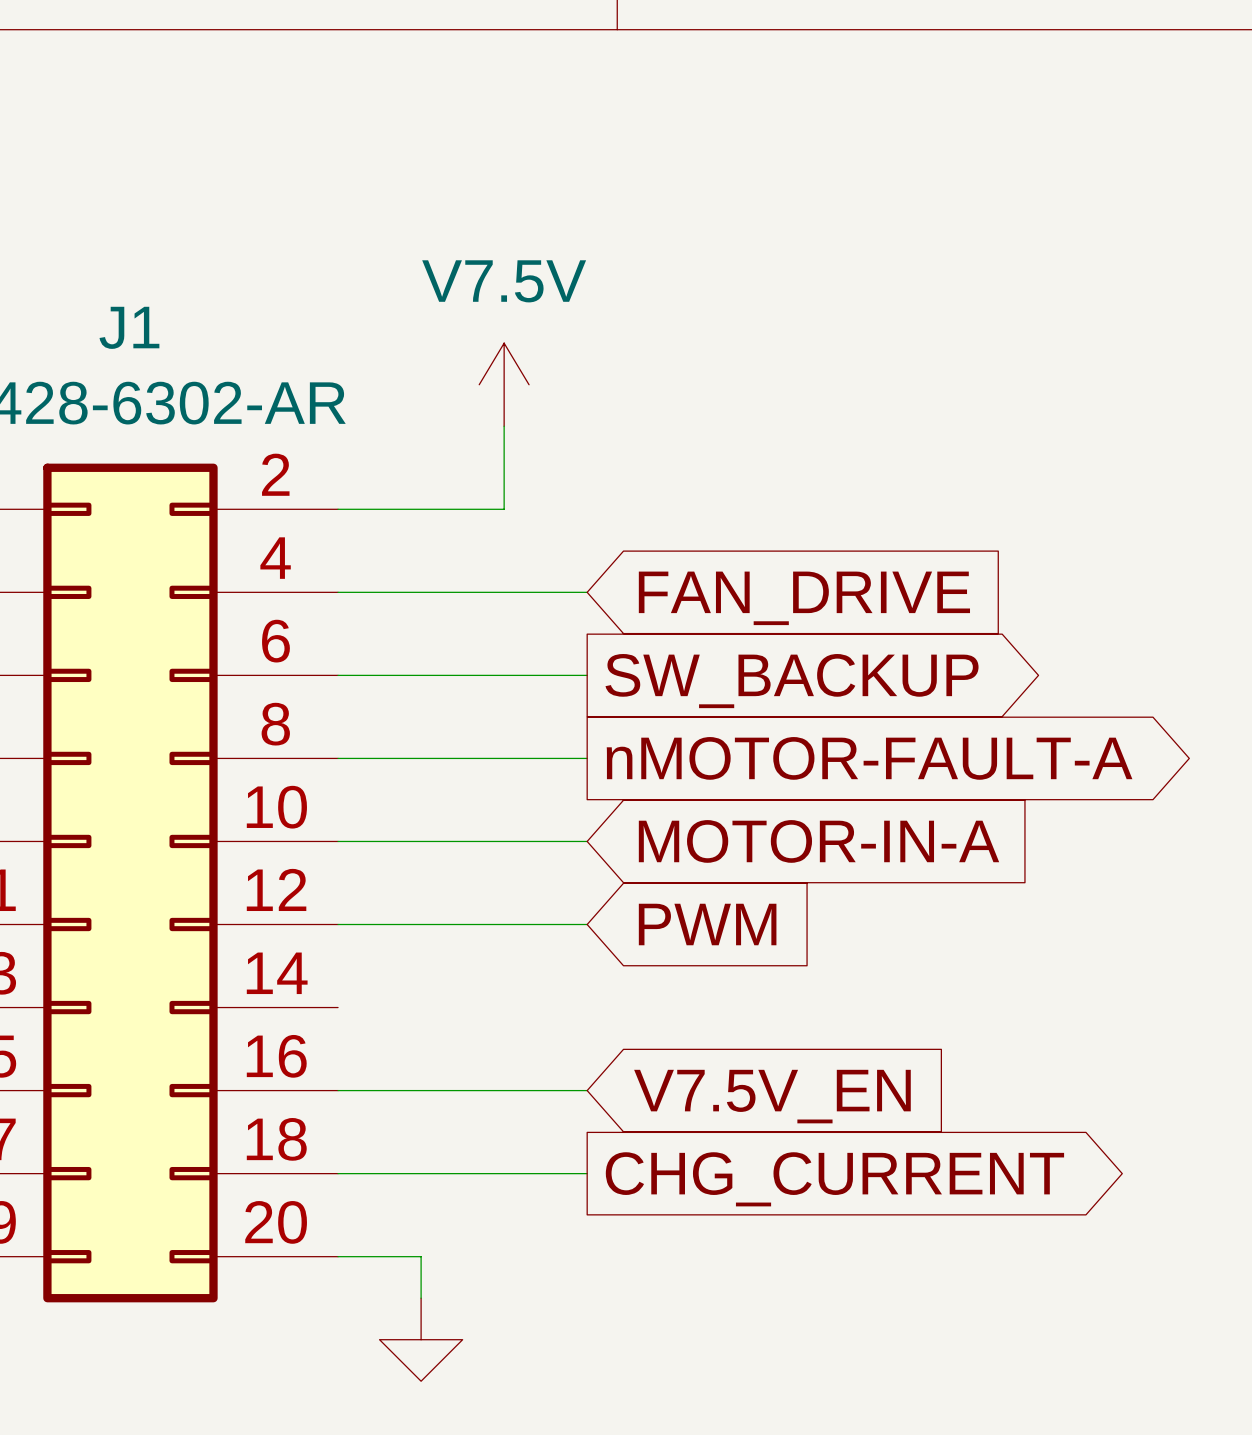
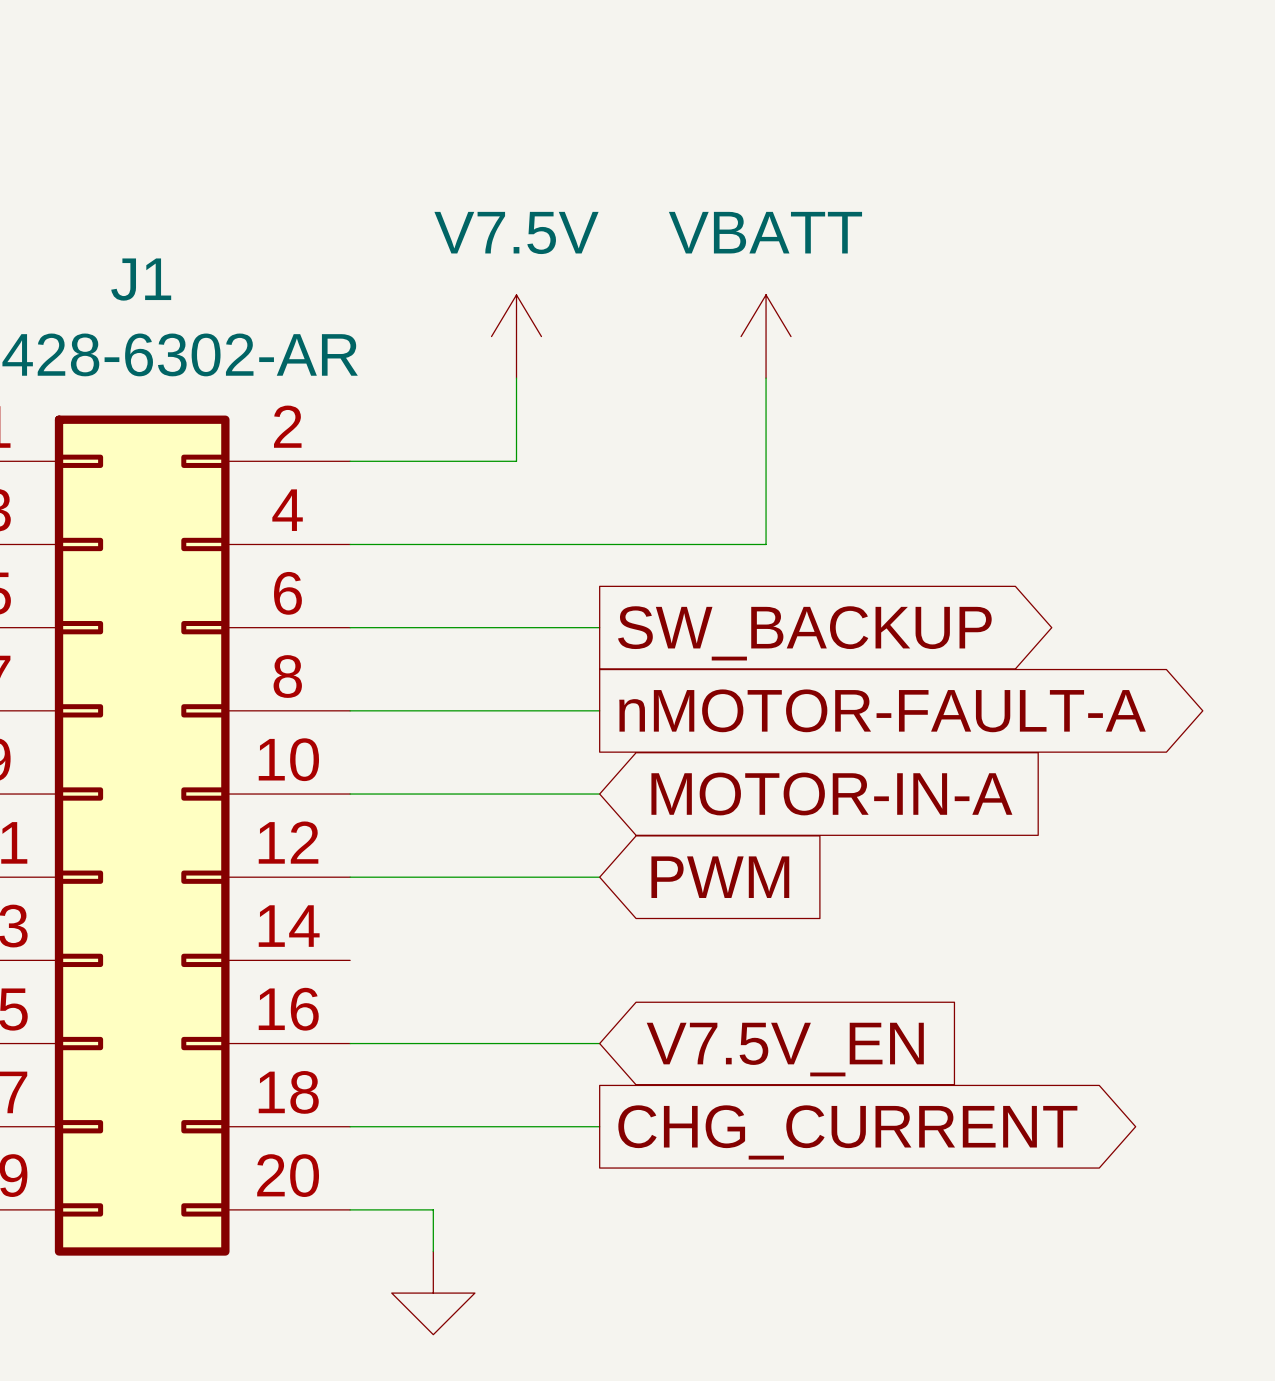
power symbol: none -> VBATT (766, 336)
wire: none -> (766, 378) (766, 544) (599, 544)
global label: FAN_DRIVE (804, 598) -> none

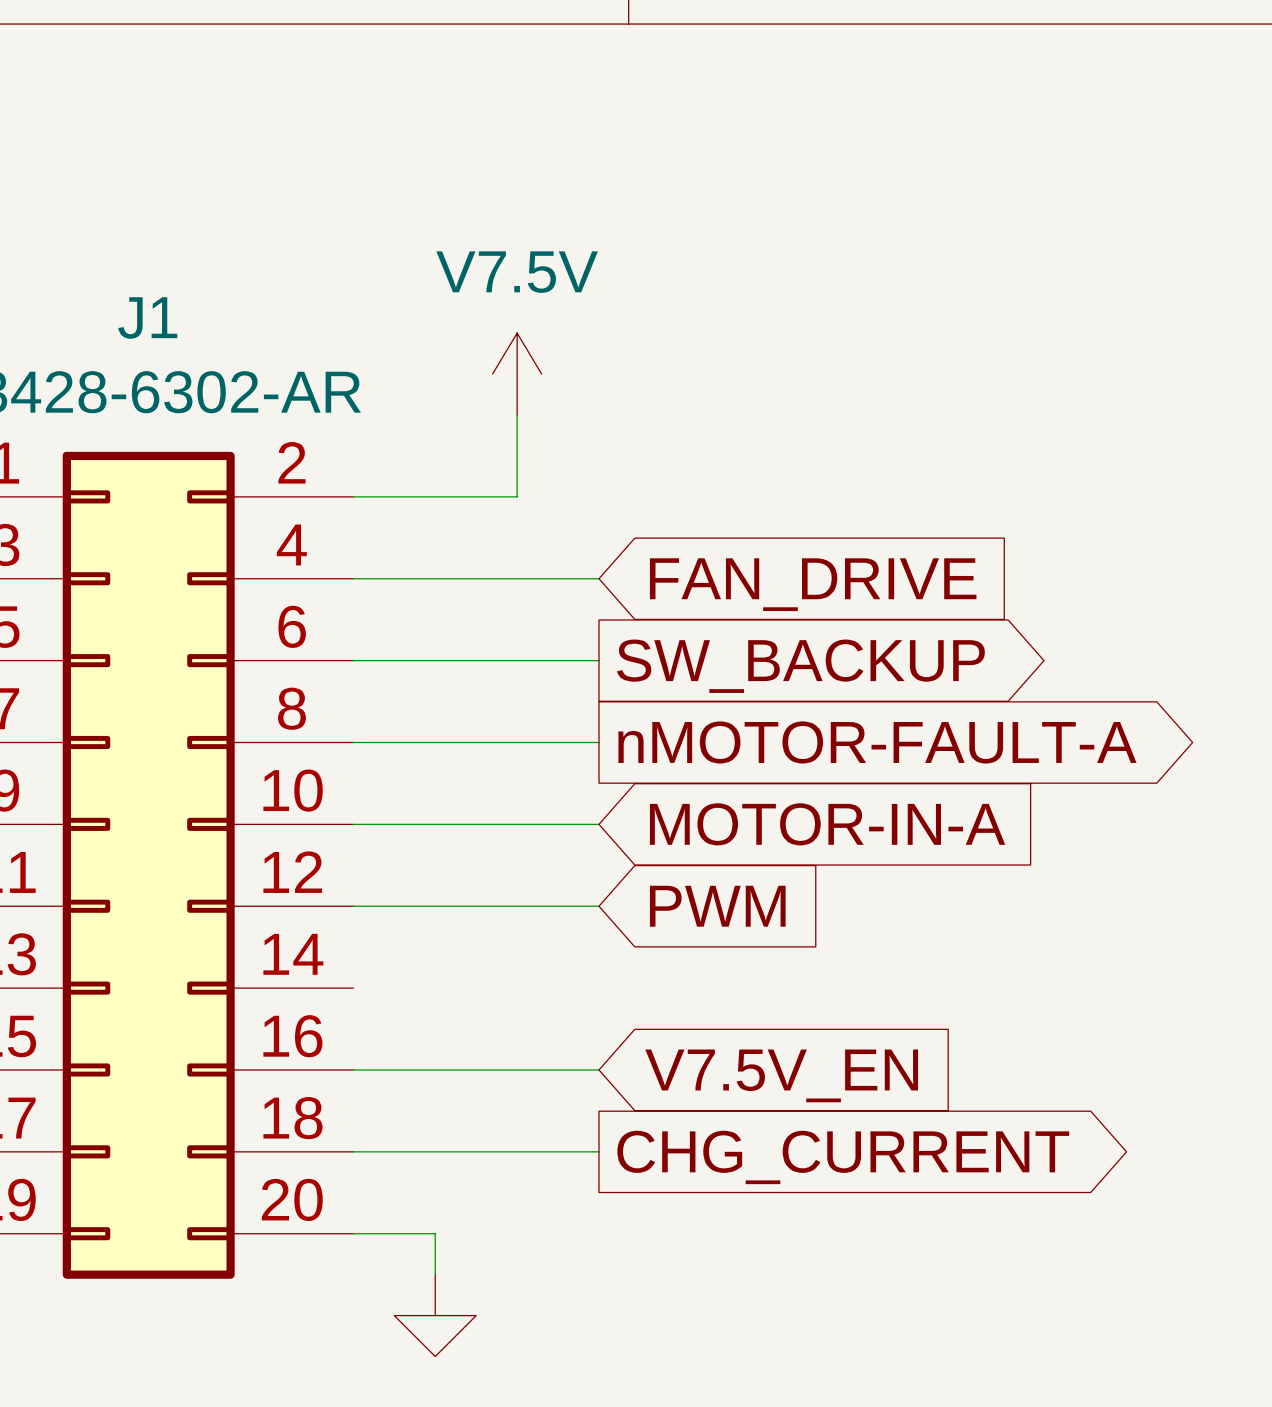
power symbol: VBATT (766, 336) -> none
wire: (766, 378) (766, 544) (599, 544) -> none
global label: none -> FAN_DRIVE (813, 584)

